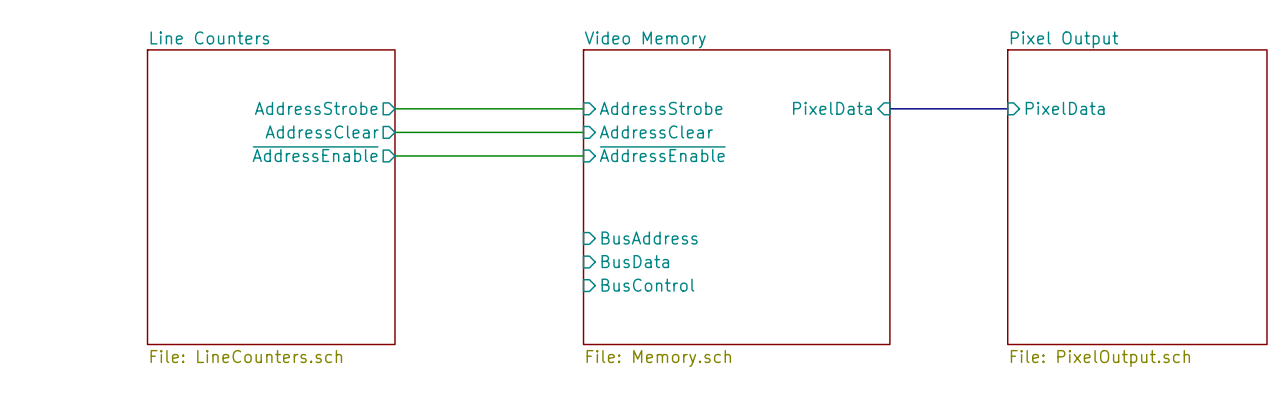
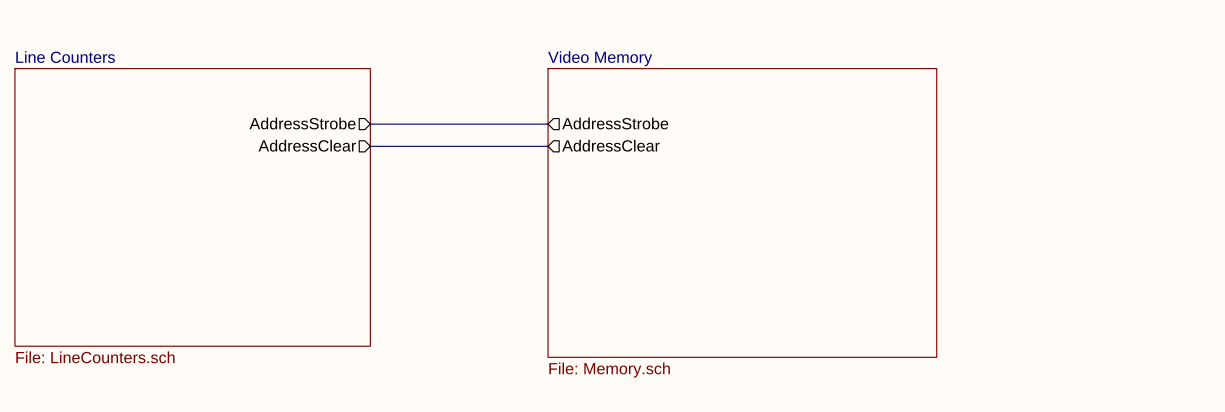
sheet pin shape: input (661, 108) -> output (615, 123)
sheet pin: PixelData (832, 108) -> none
bus: (889, 108) (1007, 108) -> none
sheet pin: PixelData (1065, 108) -> none
sheet pin shape: input (656, 131) -> output (610, 145)
sheet pin: ~{AddressEnable} (315, 154) -> none
sheet pin: ~{AddressEnable} (662, 154) -> none
wire: (394, 155) (583, 155) -> none
sheet Line Counters: none -> File: LineCounters.sch (192, 207)
sheet Line Counters: File: LineCounters.sch (271, 197) -> none
sheet Video Memory: File: Memory.sch (736, 197) -> none
sheet Pixel Output: File: PixelOutput.sch (1137, 197) -> none
sheet Video Memory: none -> File: Memory.sch (742, 212)
sheet pin: BusAddress (649, 238) -> none
sheet pin: BusData (635, 261) -> none
sheet pin: BusControl (647, 285) -> none

